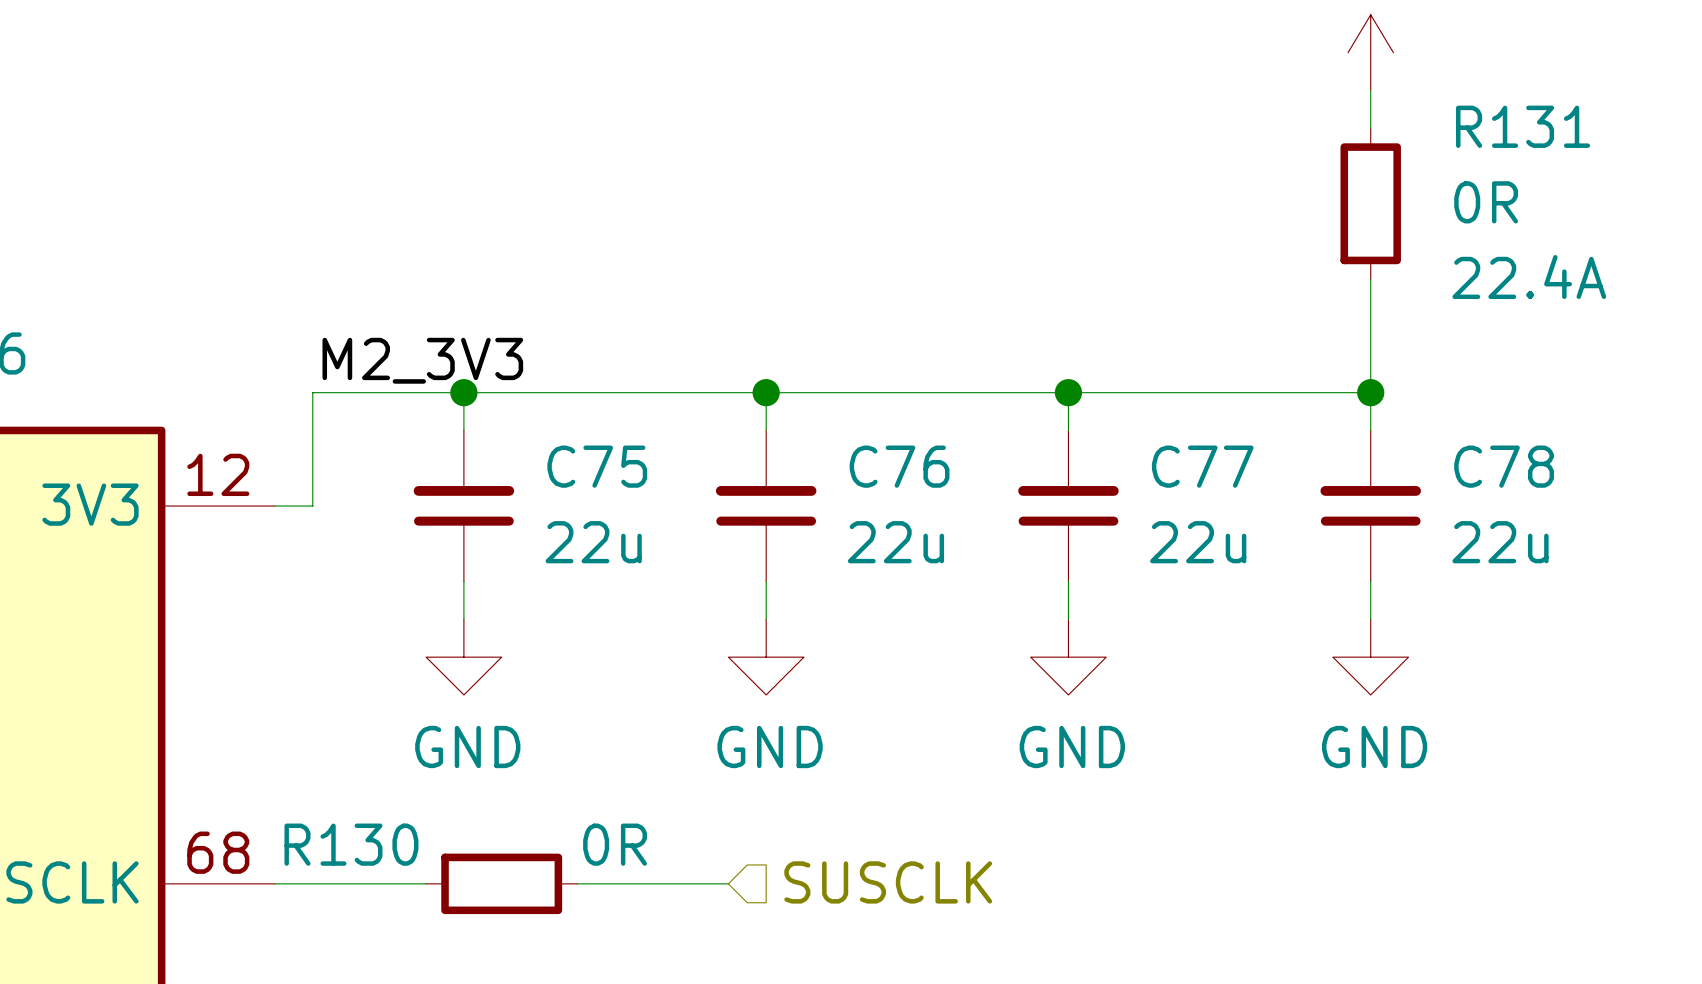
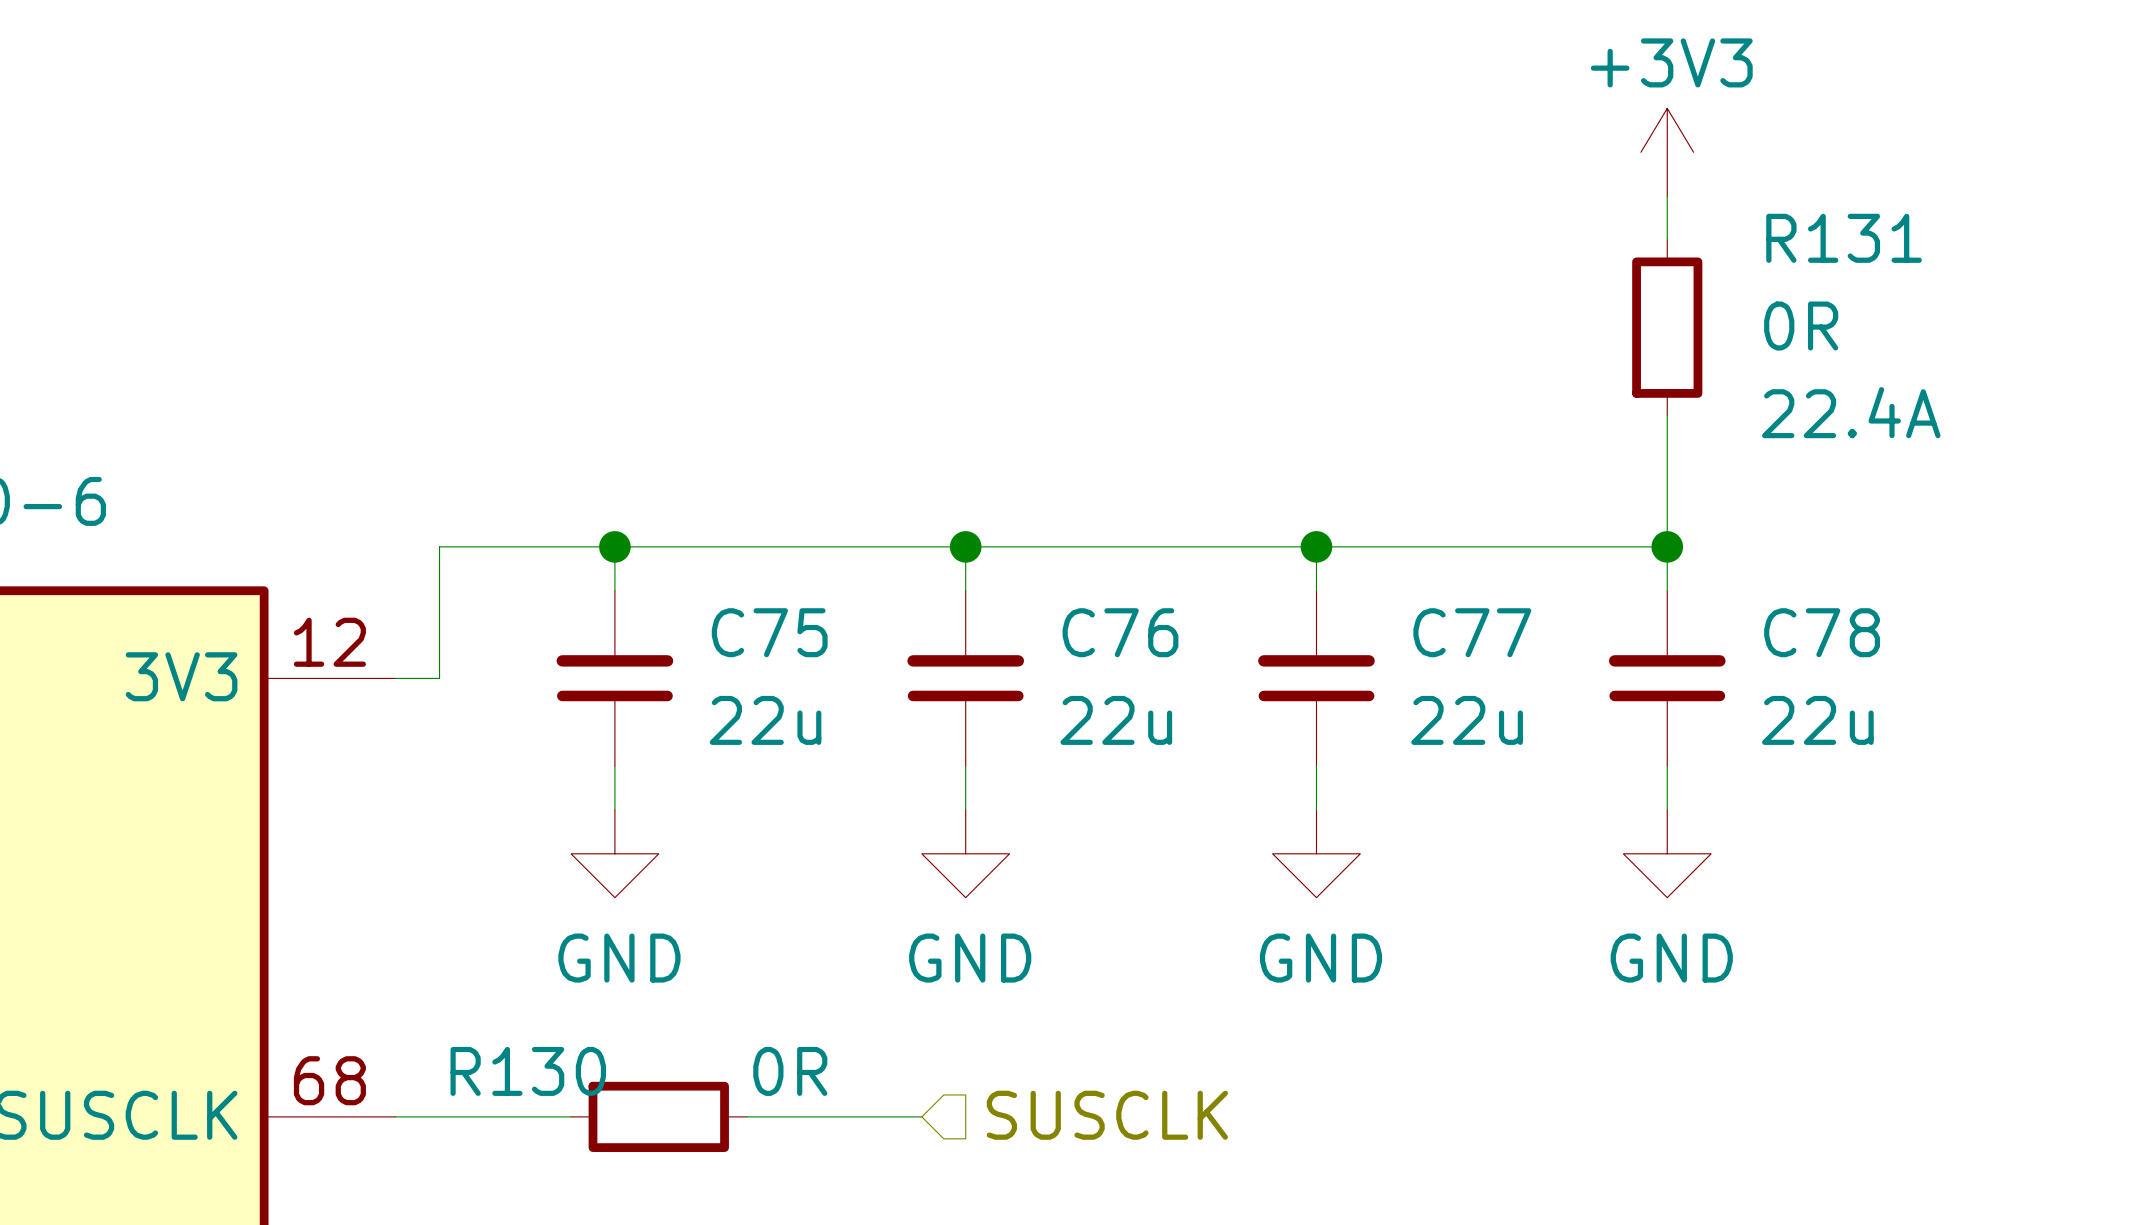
label: M2_3V3 (422, 360) -> none
R130 name position: R130 (351, 844) -> R130 (528, 1071)

